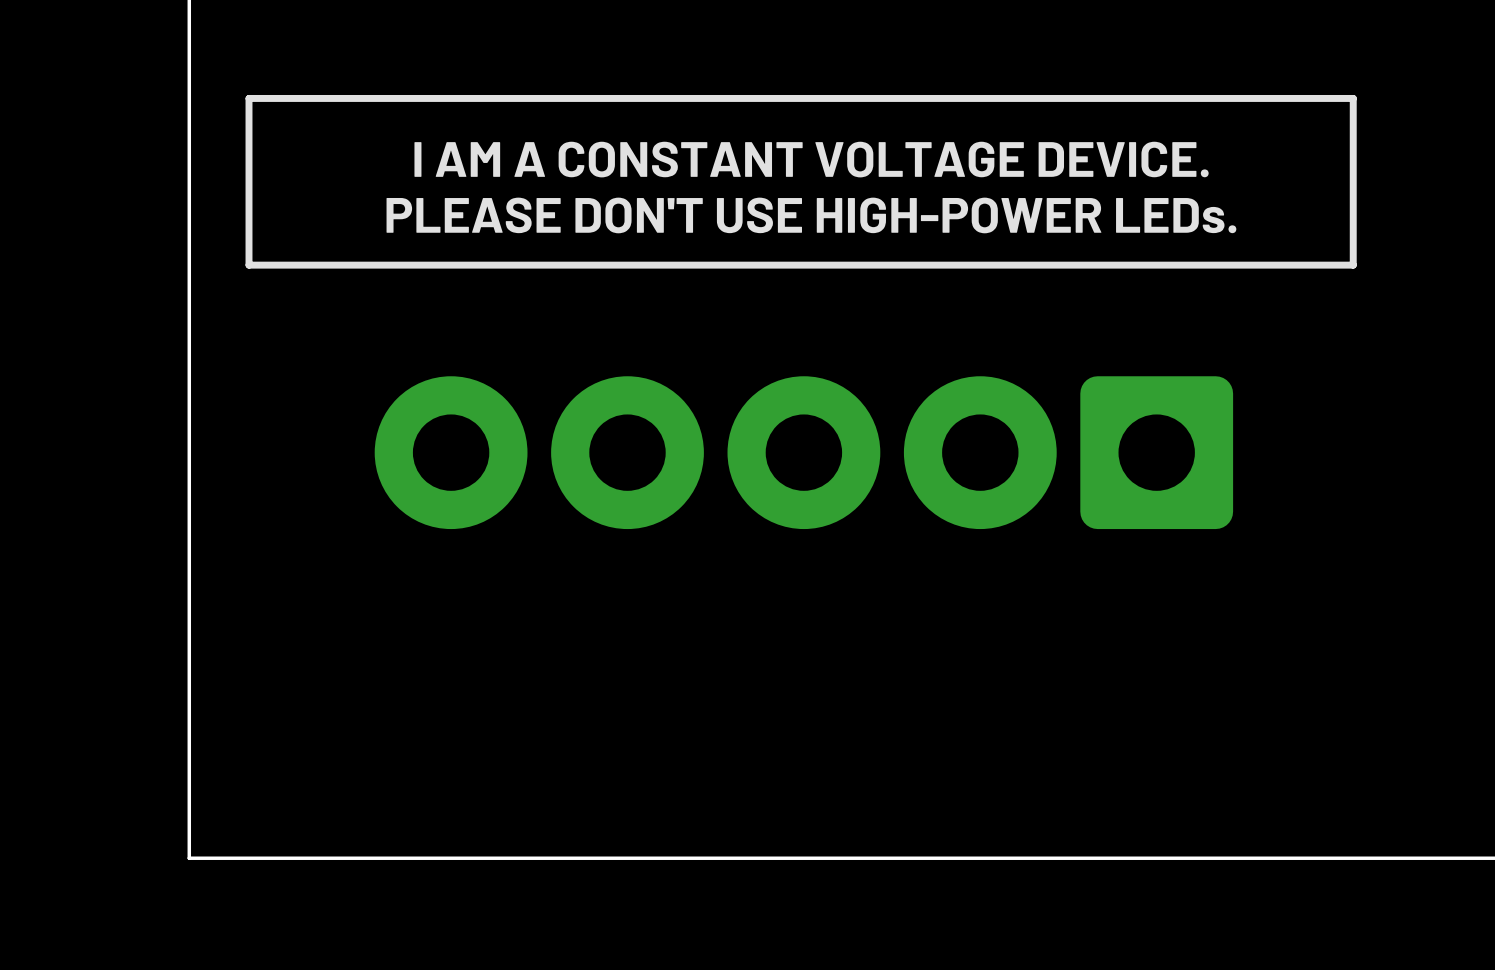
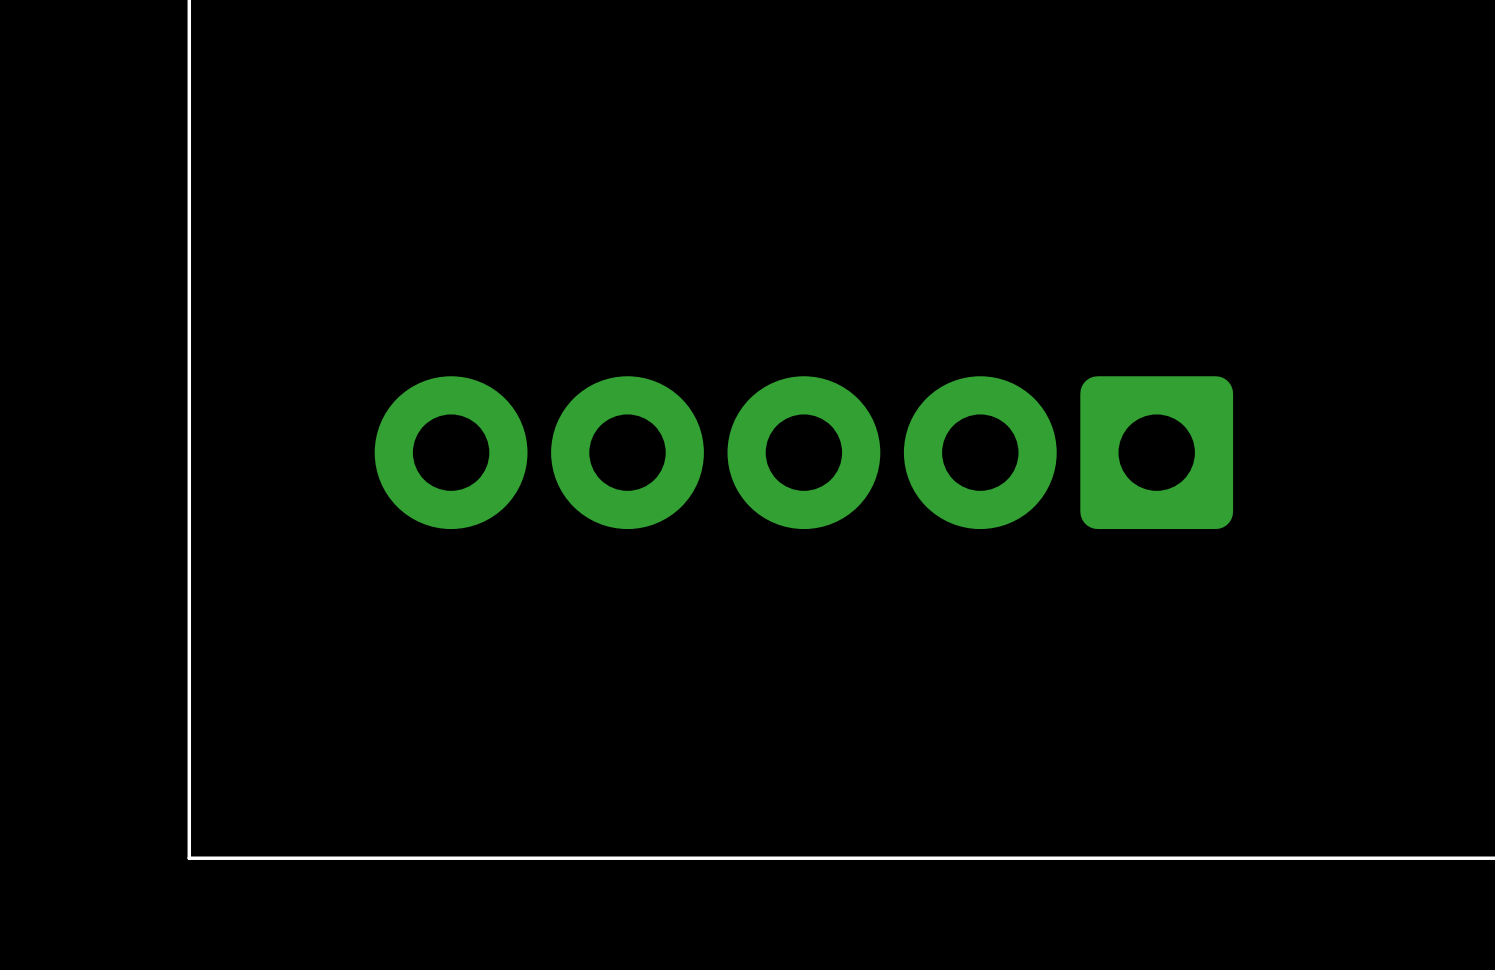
line: (1353, 98) (249, 98) (249, 265) (1353, 265) (1353, 98) -> none
text: I AM A CONSTANT VOLTAGE DEVICE. (811, 159) -> none
text: PLEASE DON'T USE HIGH-POWER LEDs. (811, 215) -> none

